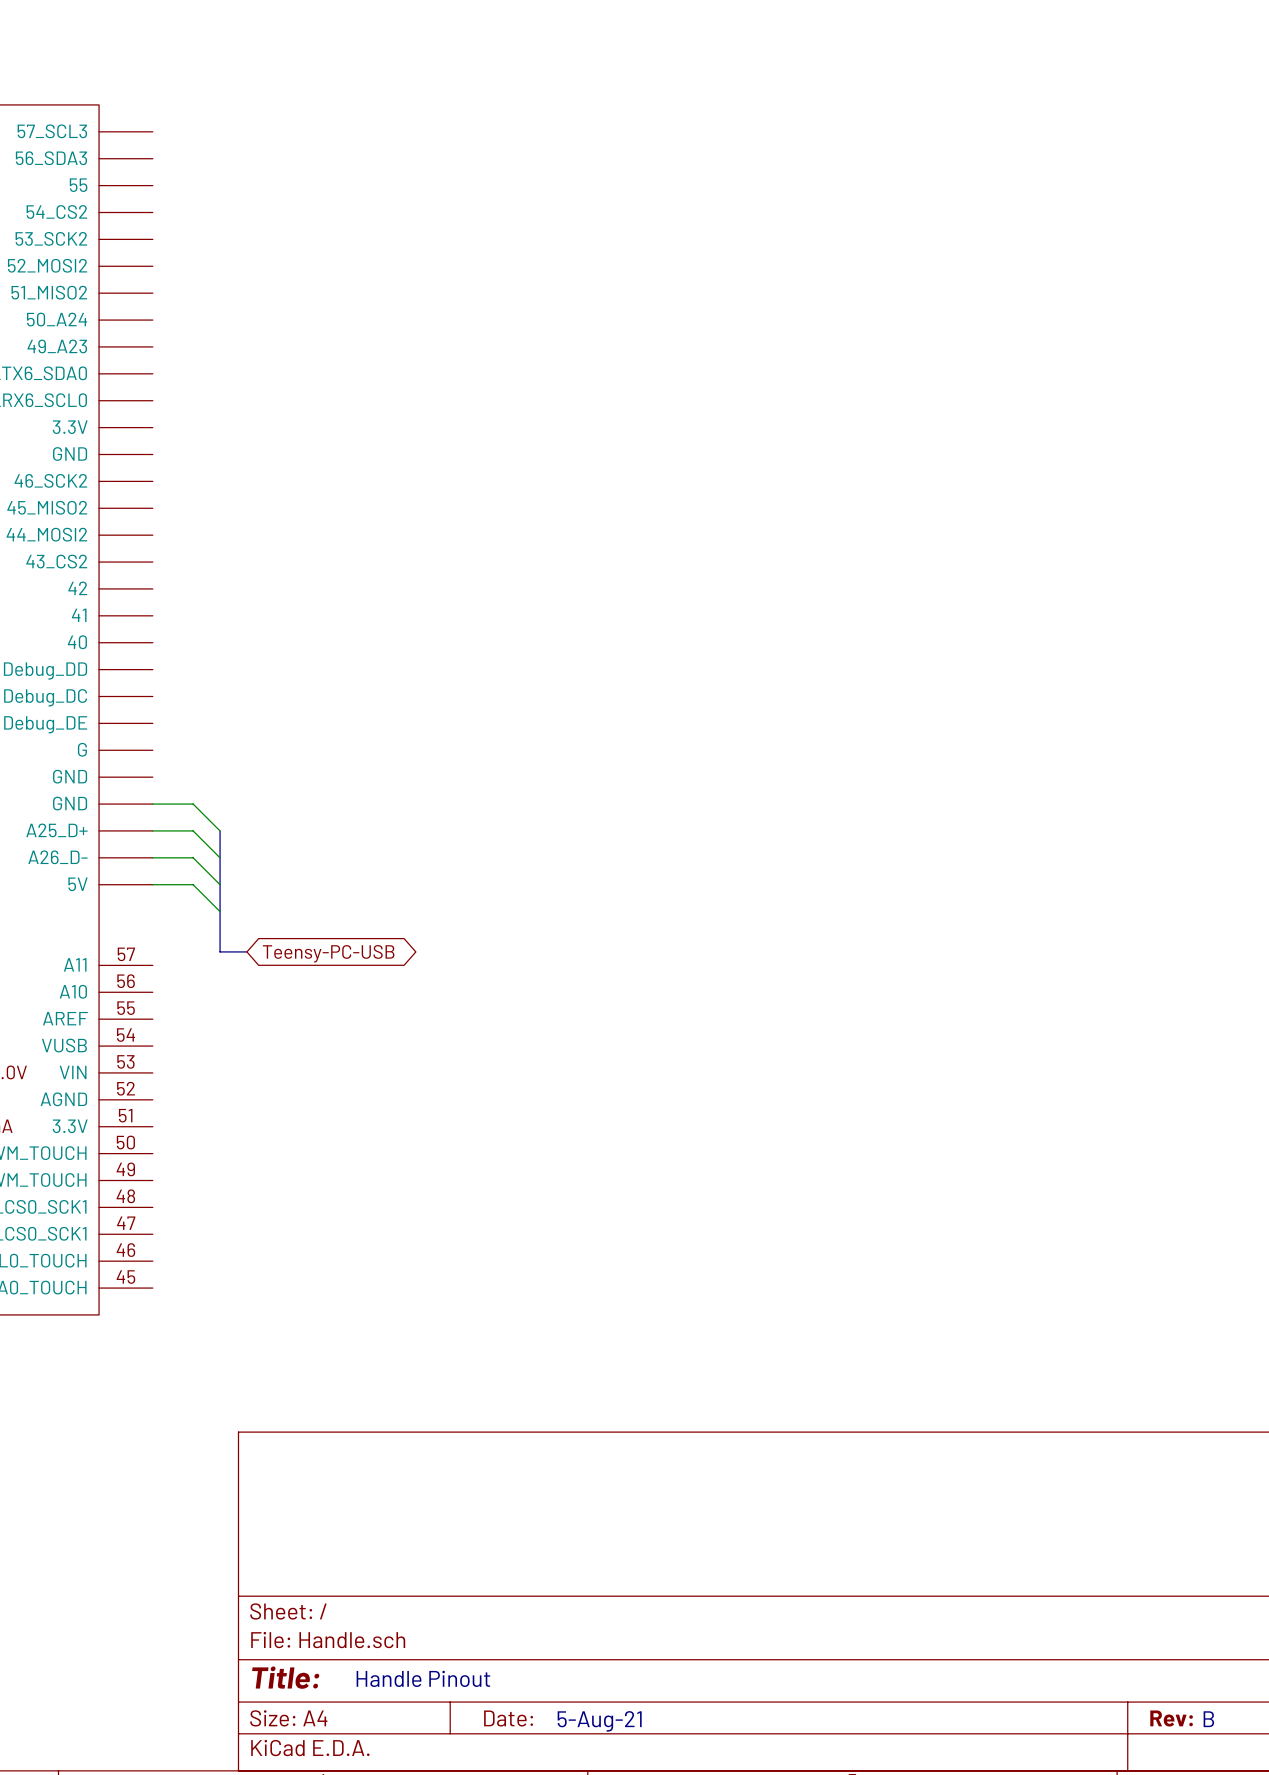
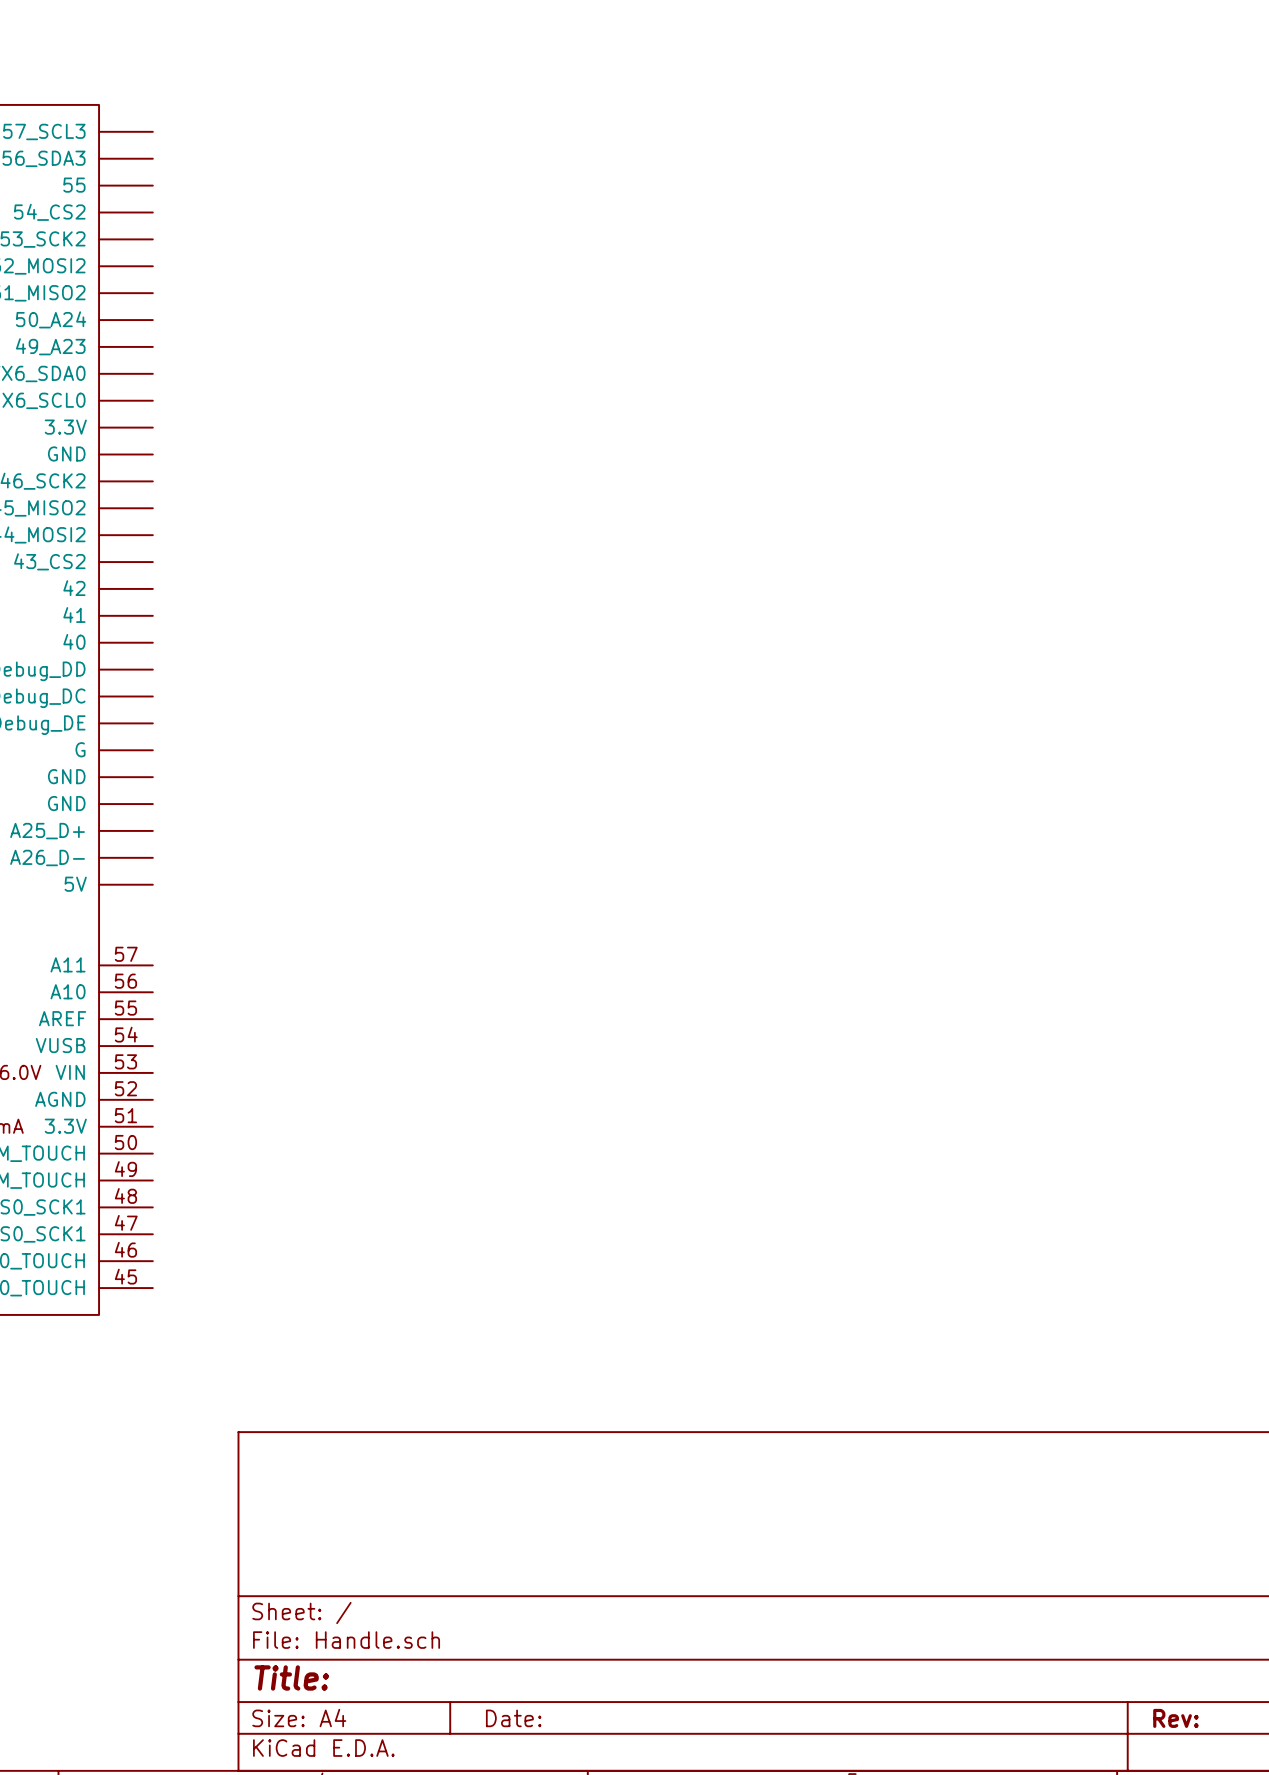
wire: (152, 804) (193, 804) (220, 830) -> none
wire: (152, 830) (193, 830) (220, 857) -> none
bus: (220, 830) (220, 951) (246, 951) -> none
wire: (152, 857) (193, 857) (220, 884) -> none
wire: (152, 884) (193, 884) (220, 911) -> none
global label: Teensy-PC-USB (328, 953) -> none
text: Handle Pinout (423, 1678) -> none
text: B (1208, 1719) -> none
text: 5-Aug-21 (599, 1721) -> none

